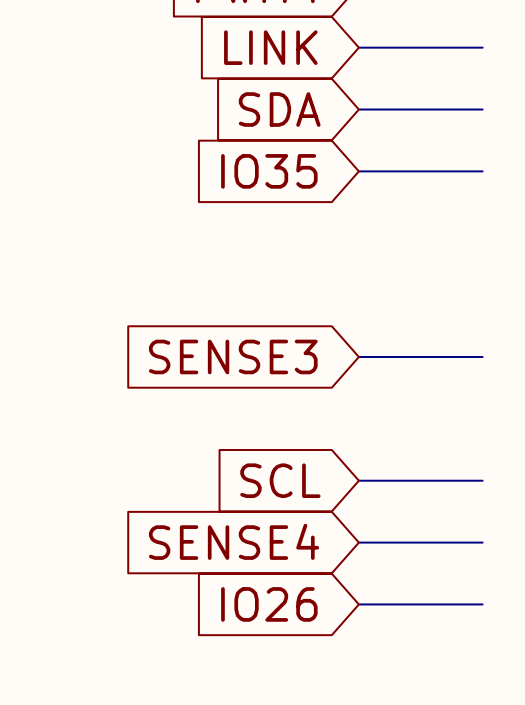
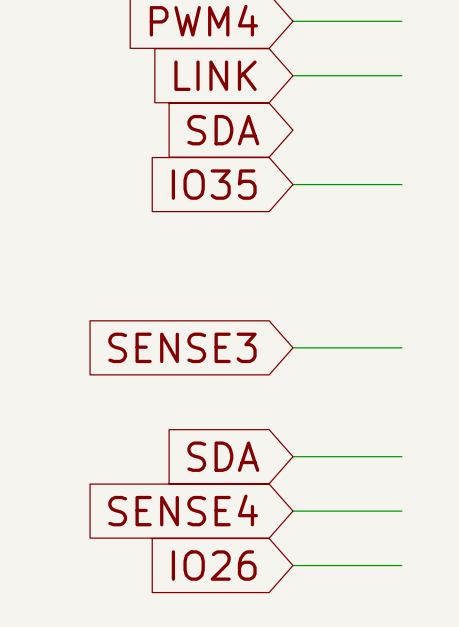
wire: (358, 109) (482, 109) -> none
global label: SCL (280, 480) -> SDA (223, 456)

